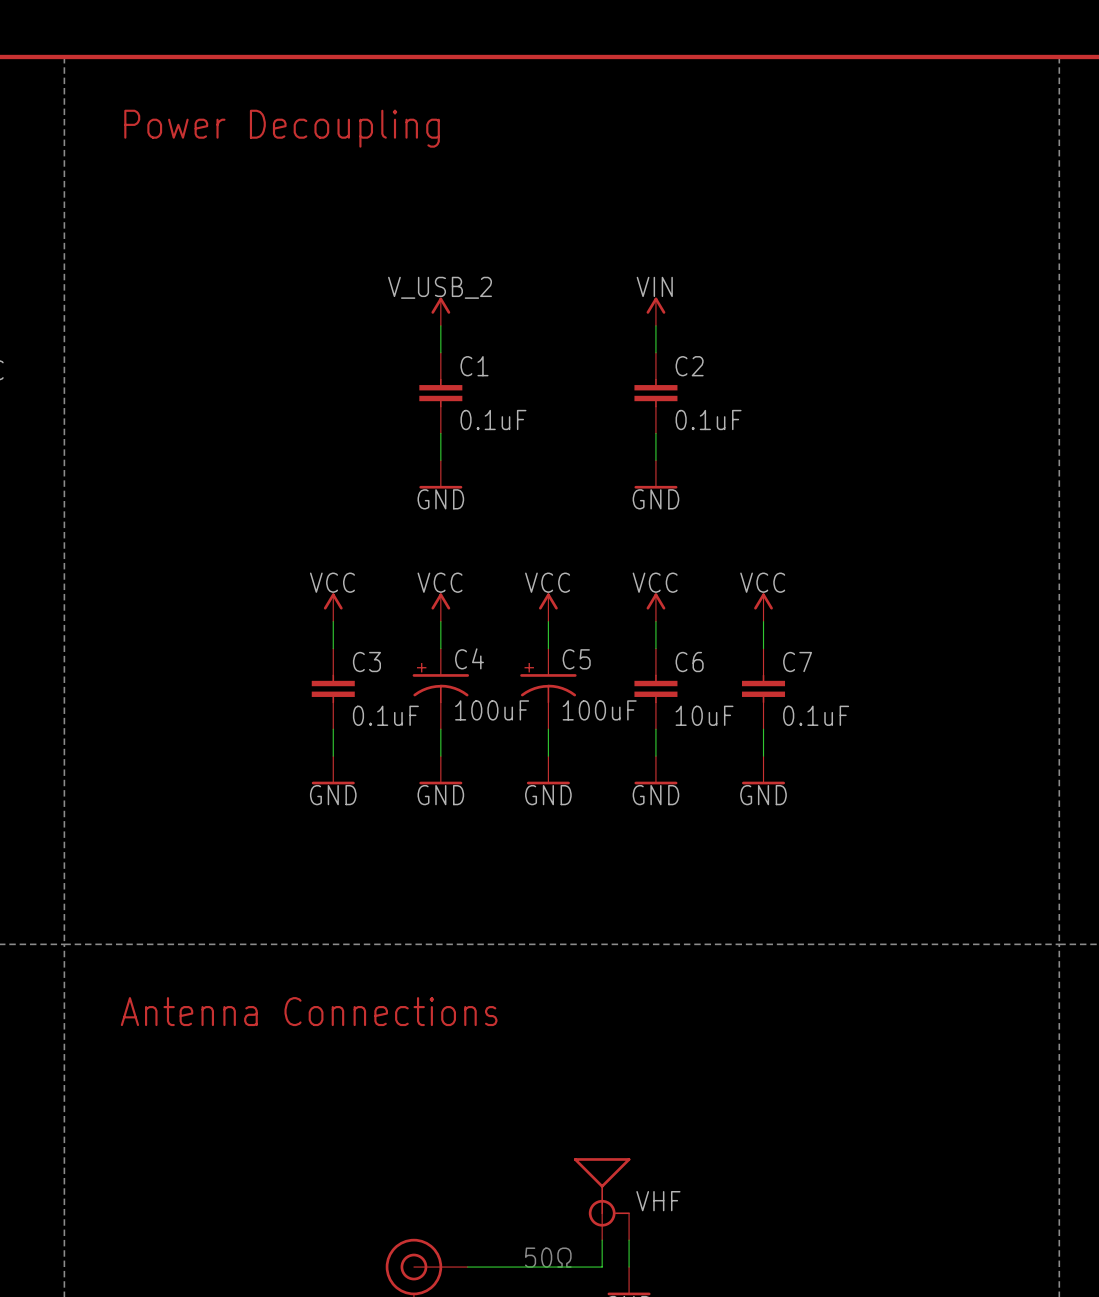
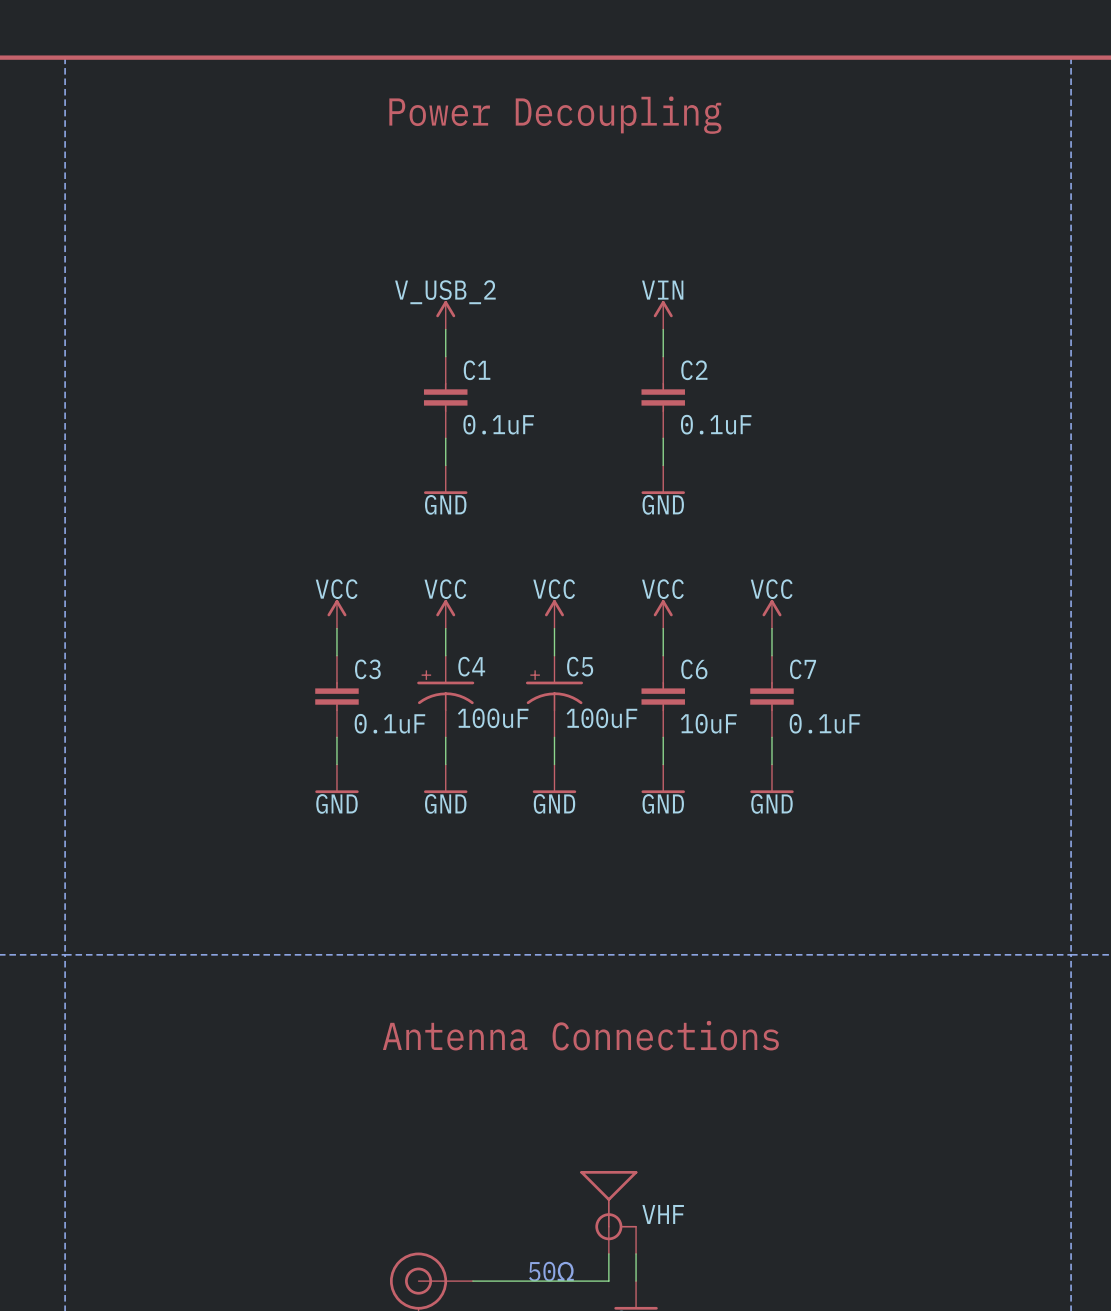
text: none -> Power Decoupling (555, 115)
text: Power Decoupling (282, 128) -> none
text: Antenna Connections (309, 1011) -> none
text: none -> Antenna Connections (580, 1035)

